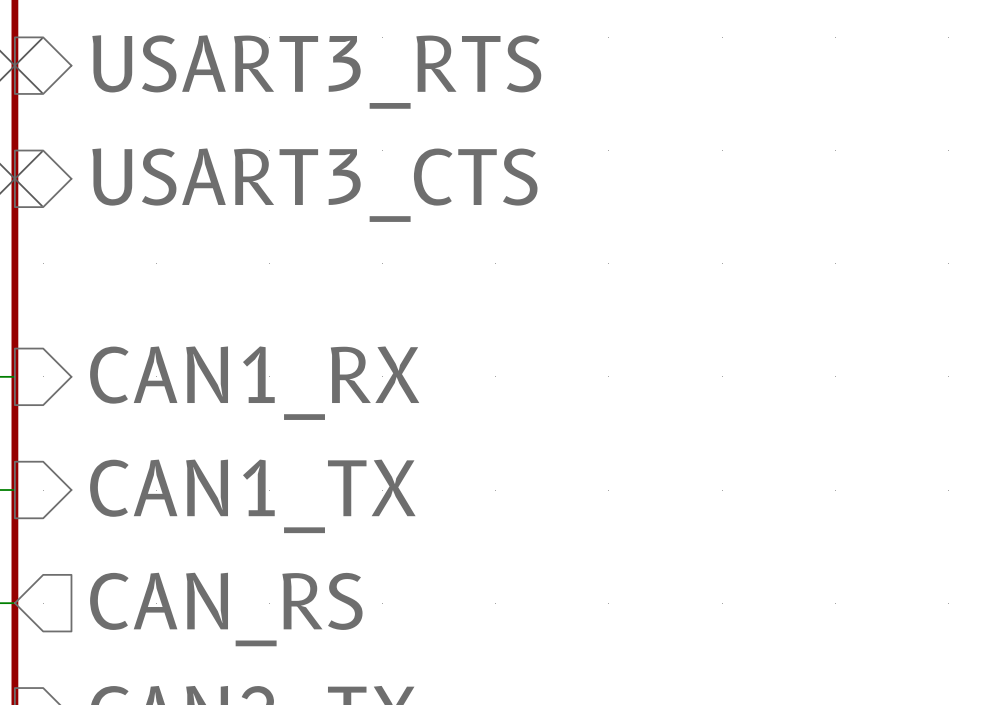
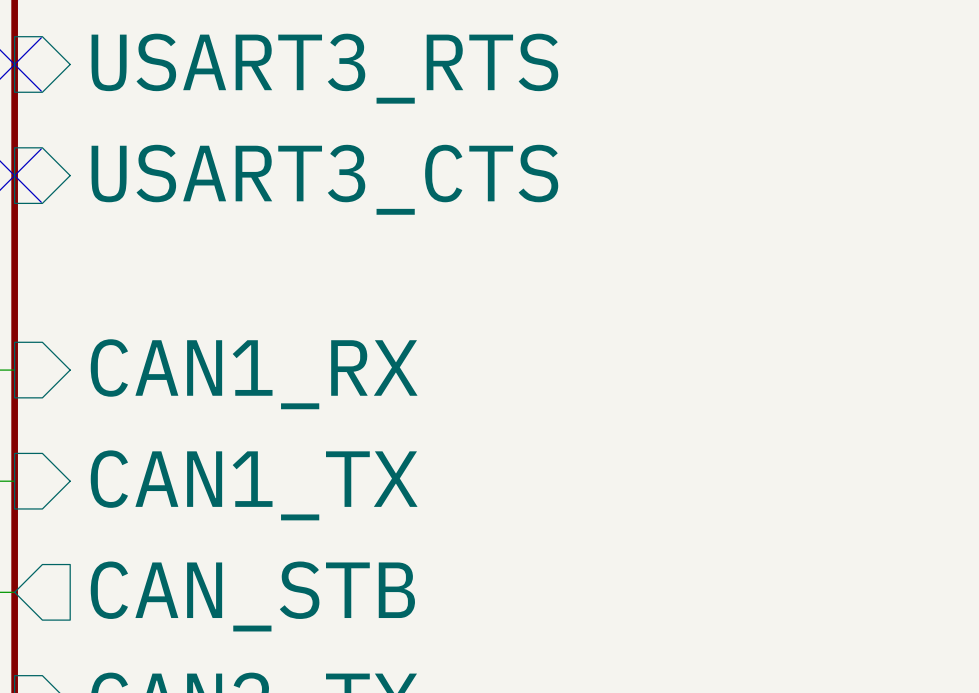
sheet pin: CAN_RS (226, 609) -> CAN_STB (252, 596)

